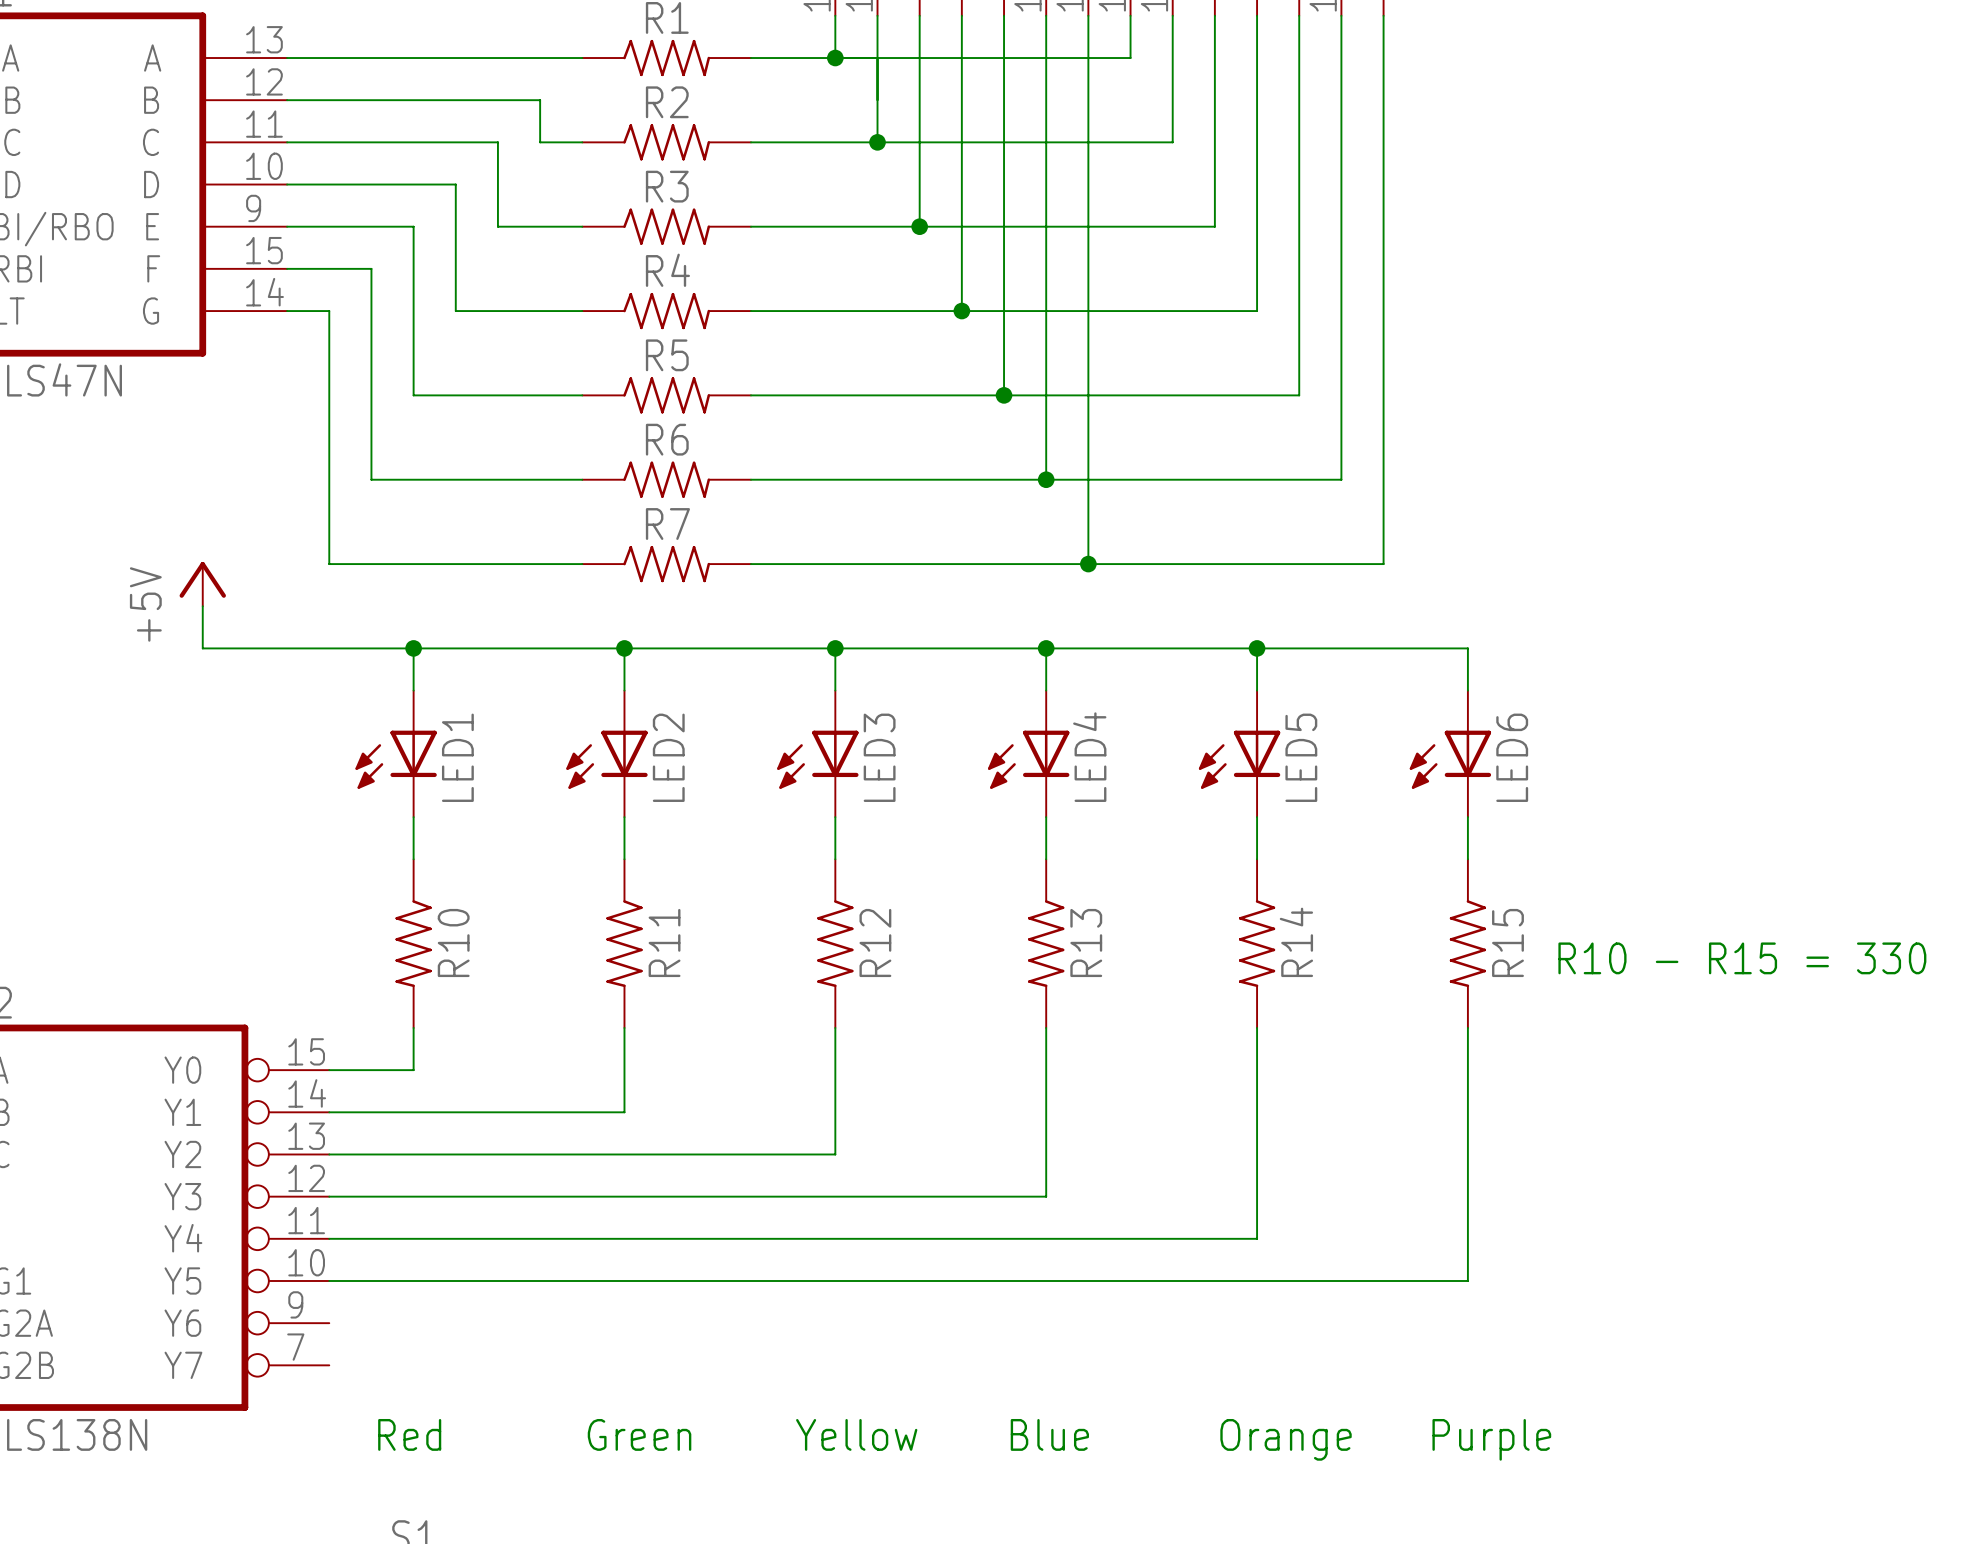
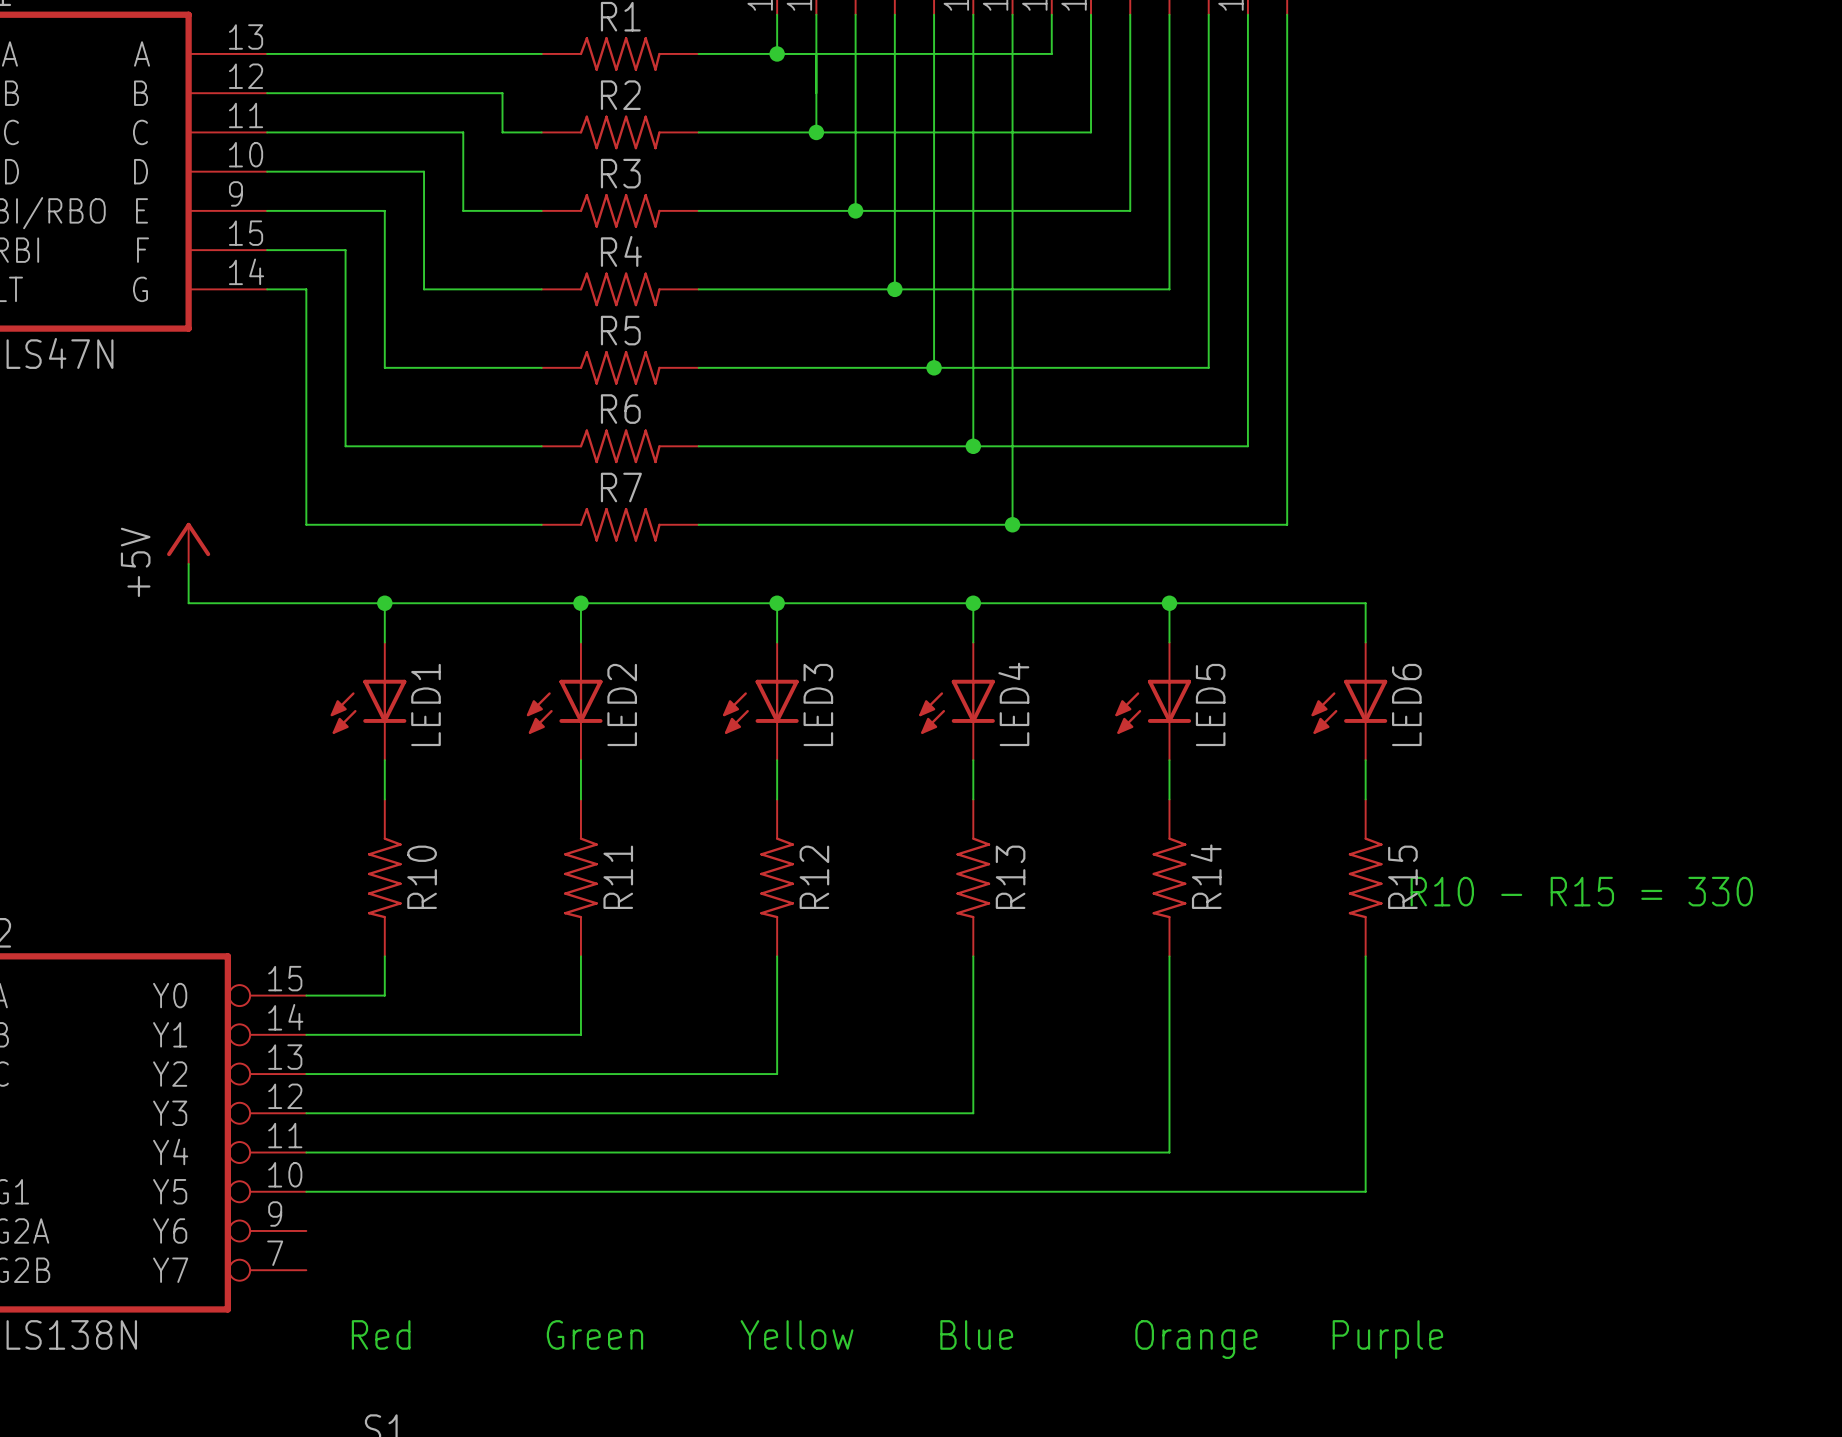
text position: R10 - R15 = 330 (1742, 958) -> R10 - R15 = 330 (1581, 891)

